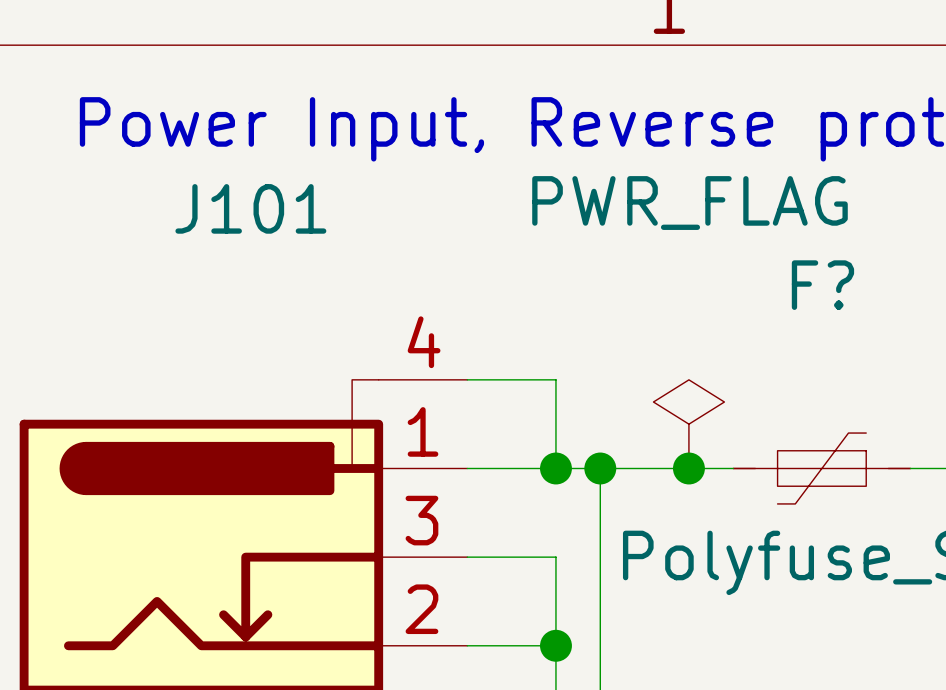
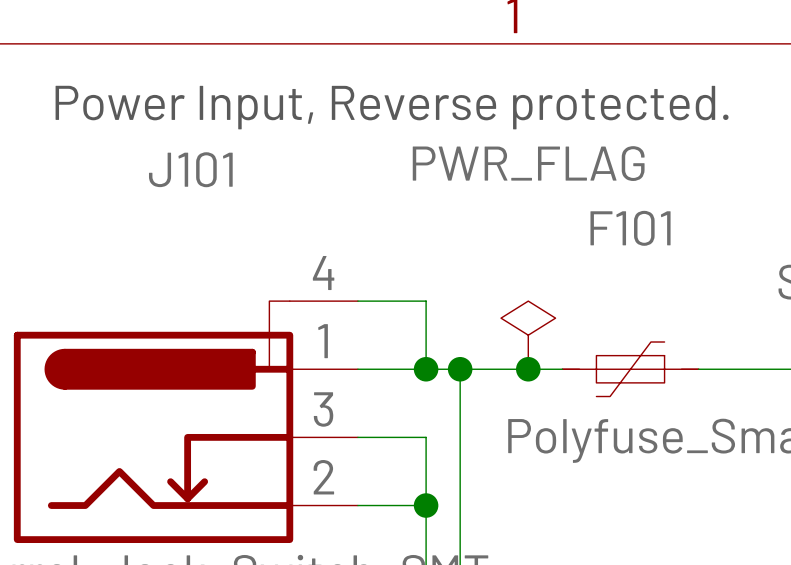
F? name: F? (822, 285) -> F101 (630, 228)

